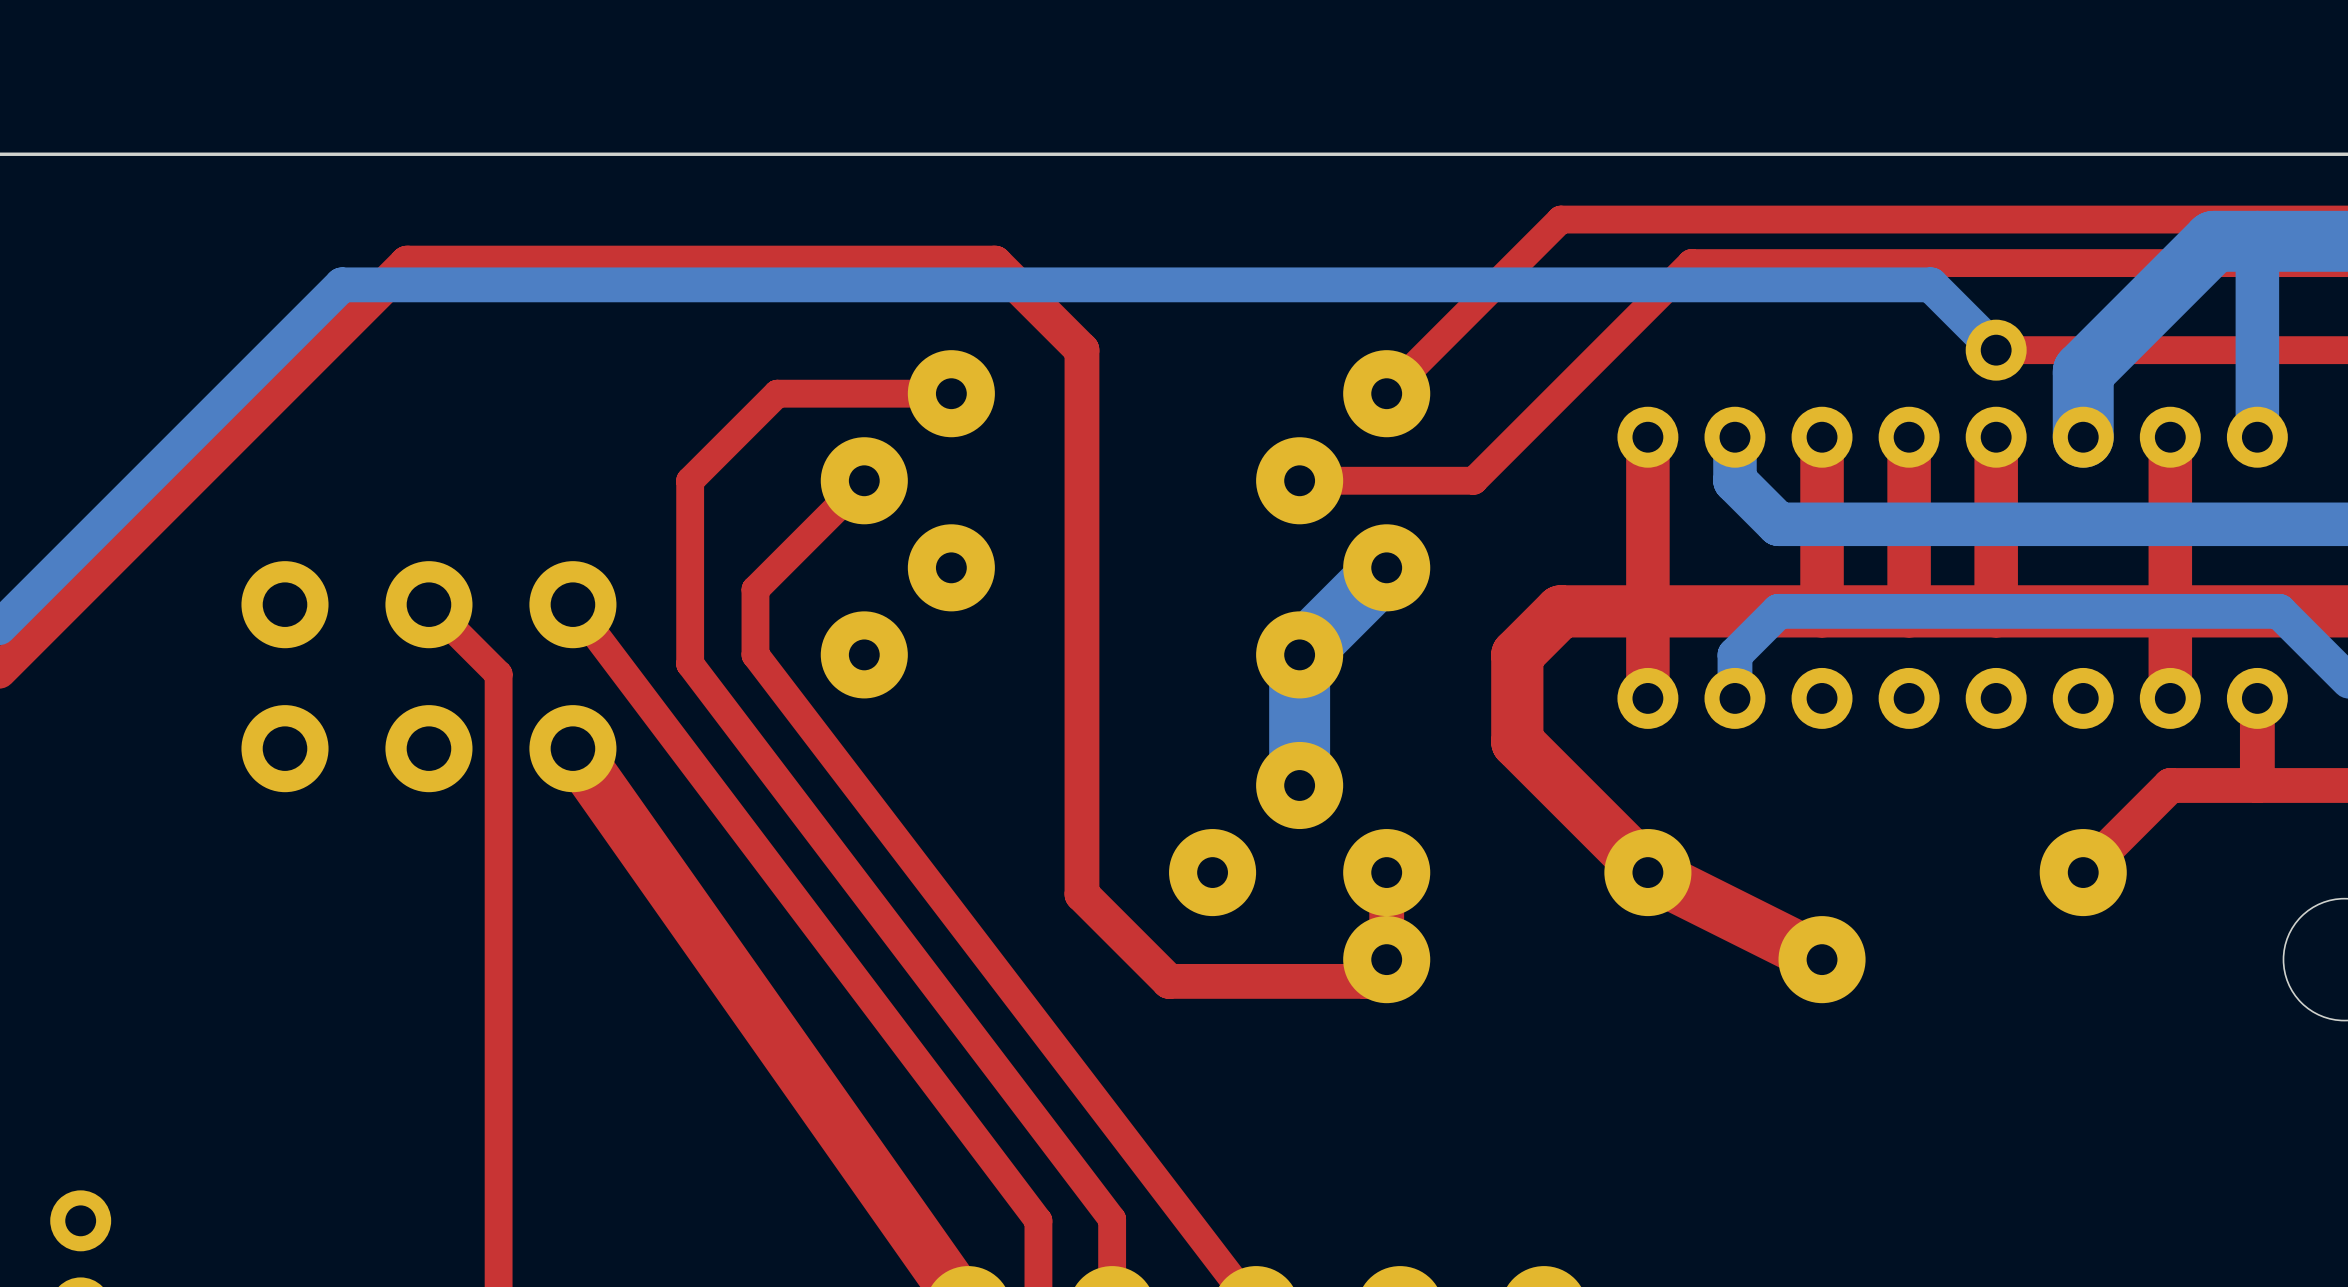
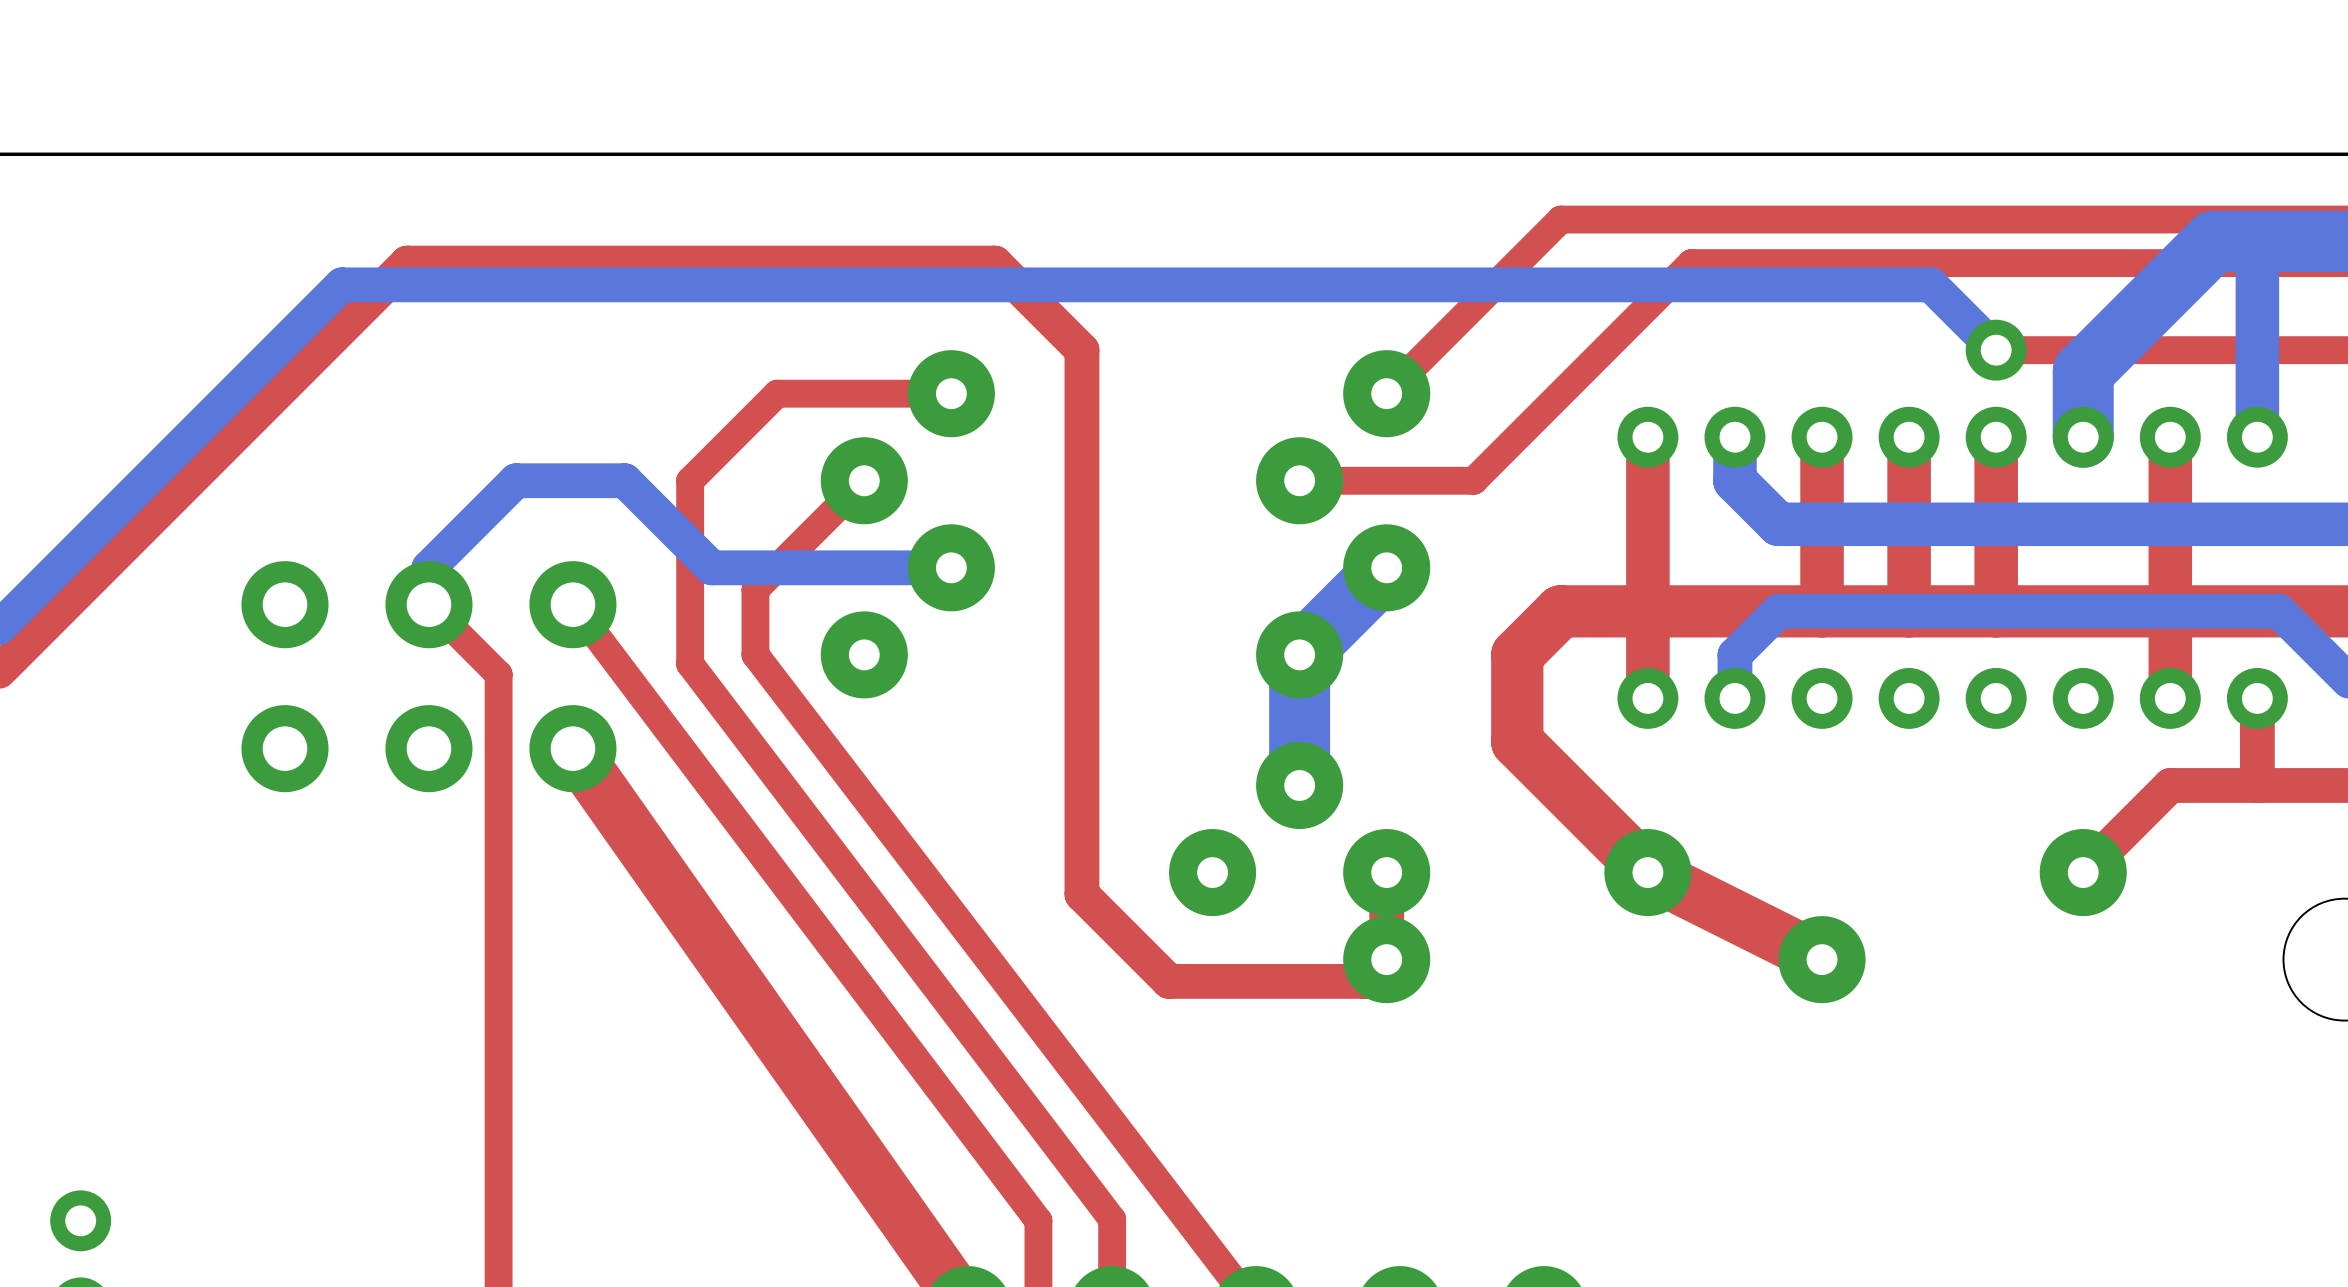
bottom track: none -> (951, 567) (711, 567) (624, 480) (516, 480) (428, 567) (428, 604)

